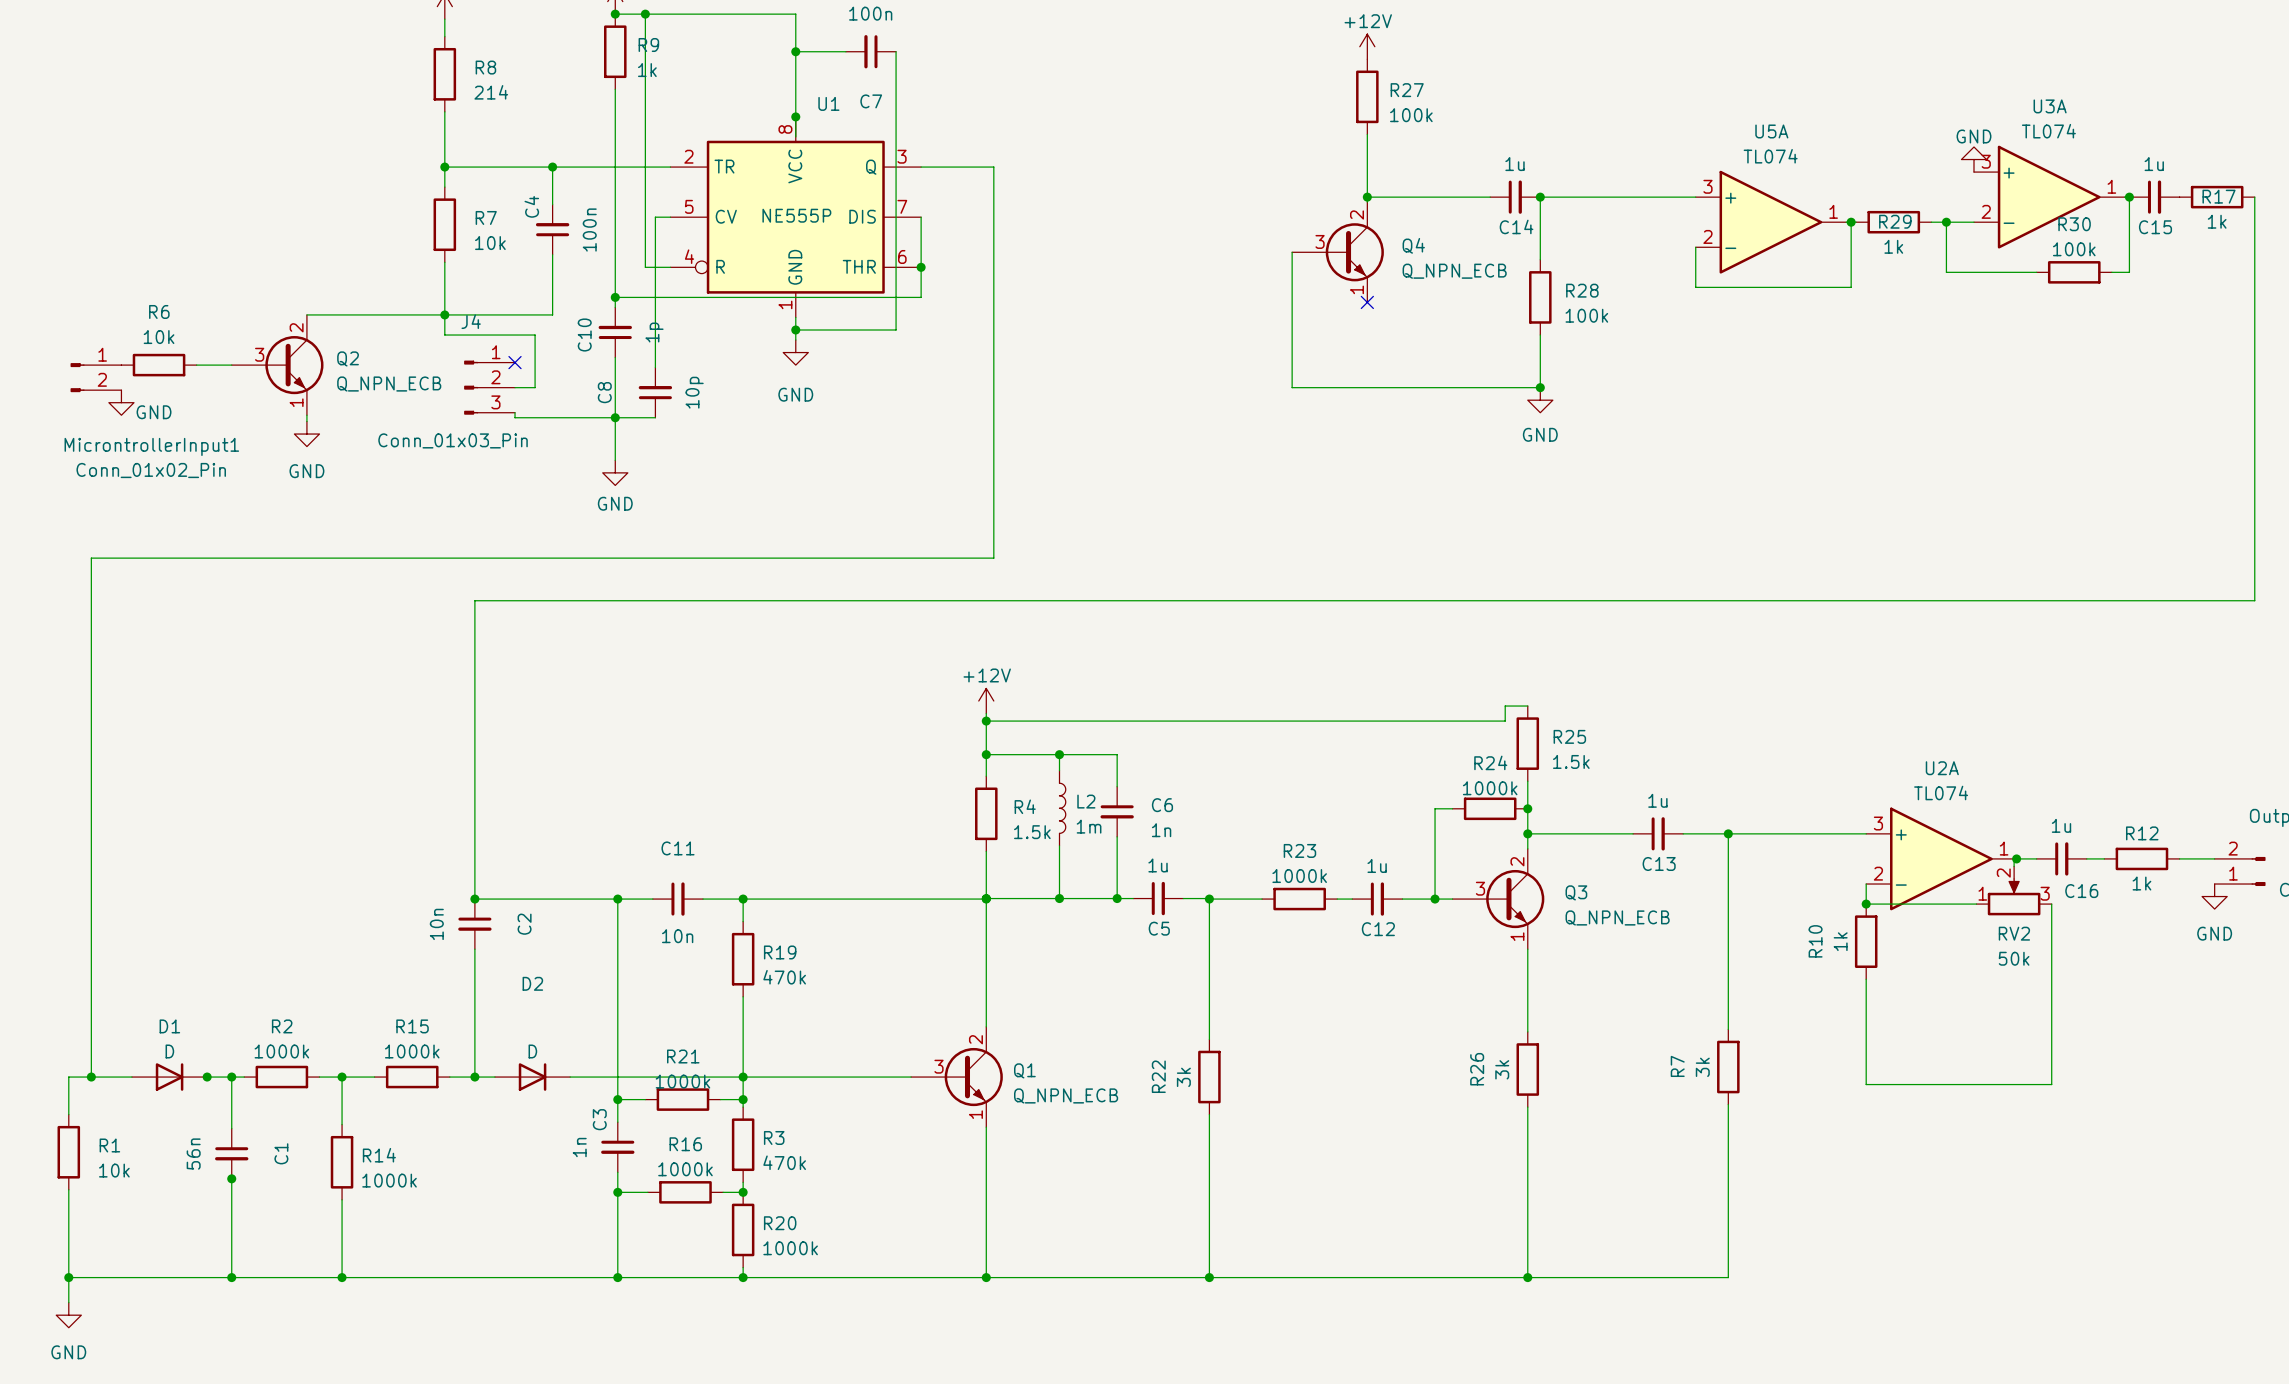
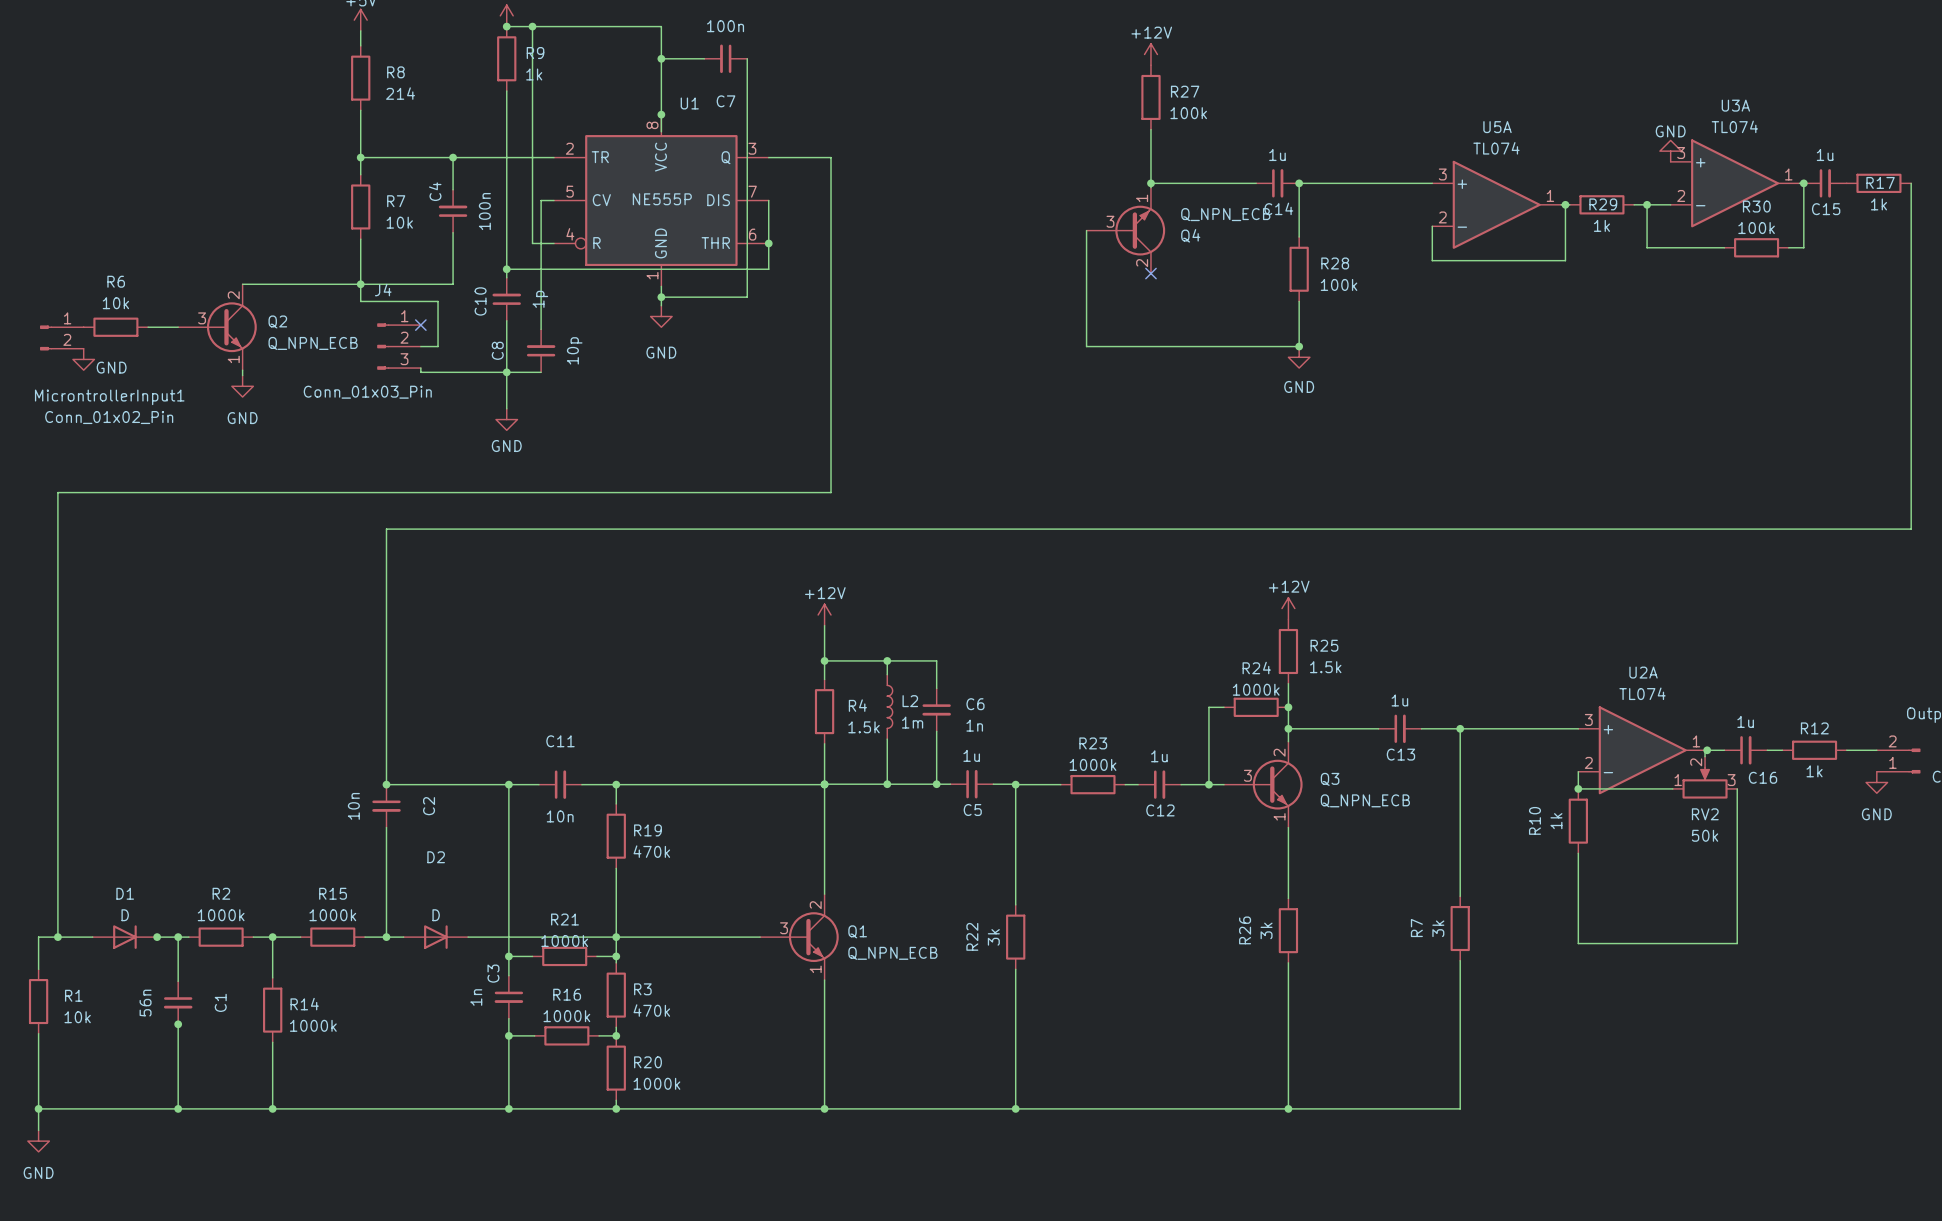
Q4 flip: as is (1354, 252) -> up-down (1140, 230)
power symbol: none -> +12V (1288, 608)
wire: (1527, 706) (1505, 706) (1505, 721) (986, 721) -> none
junction: (986, 721) -> none

